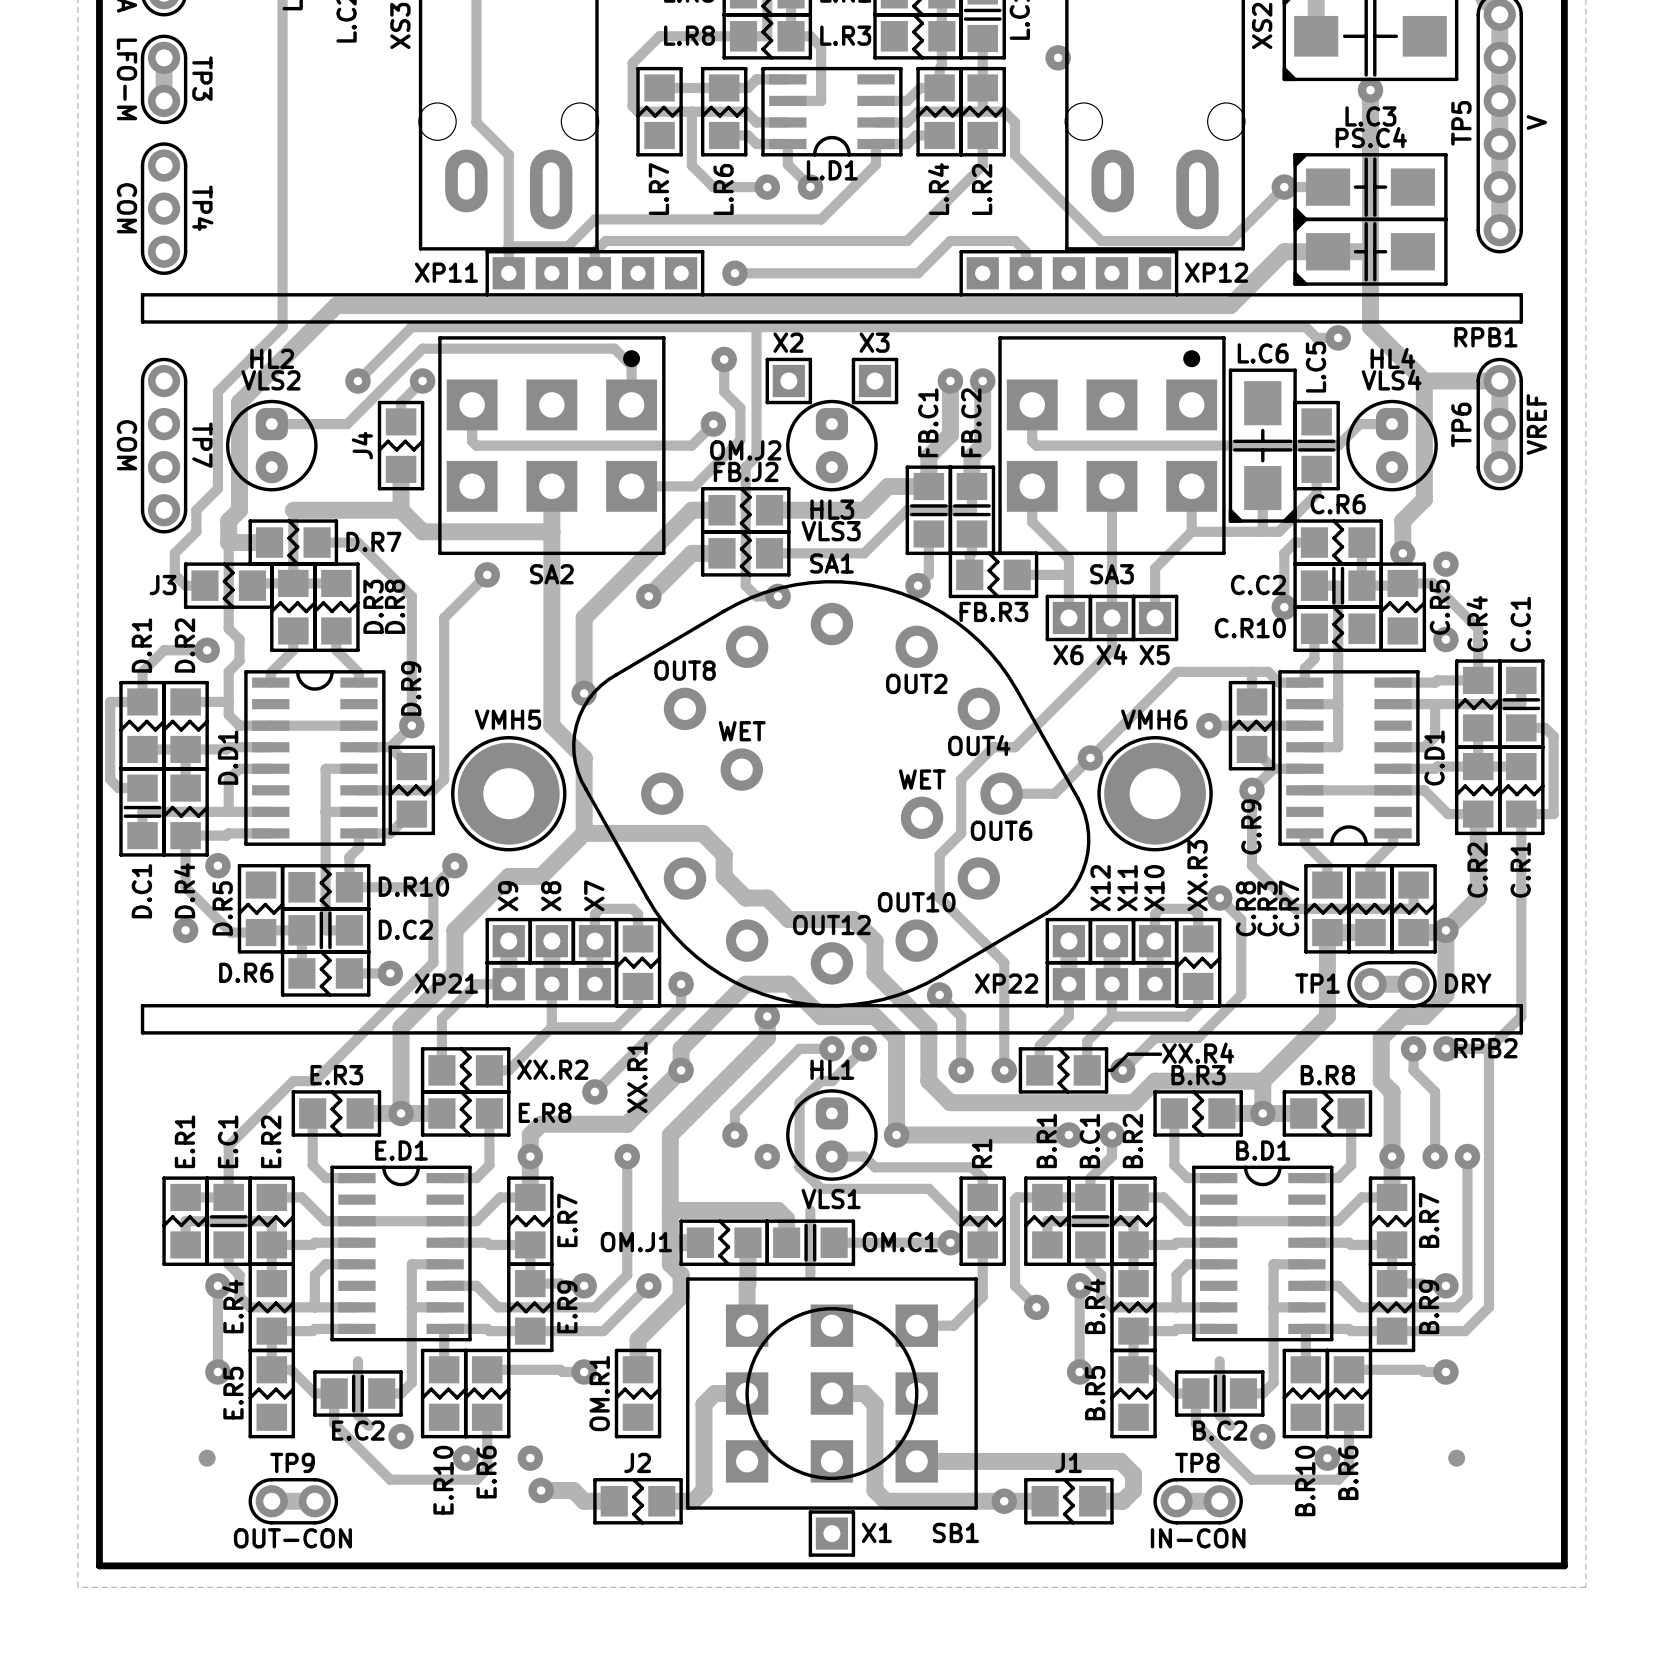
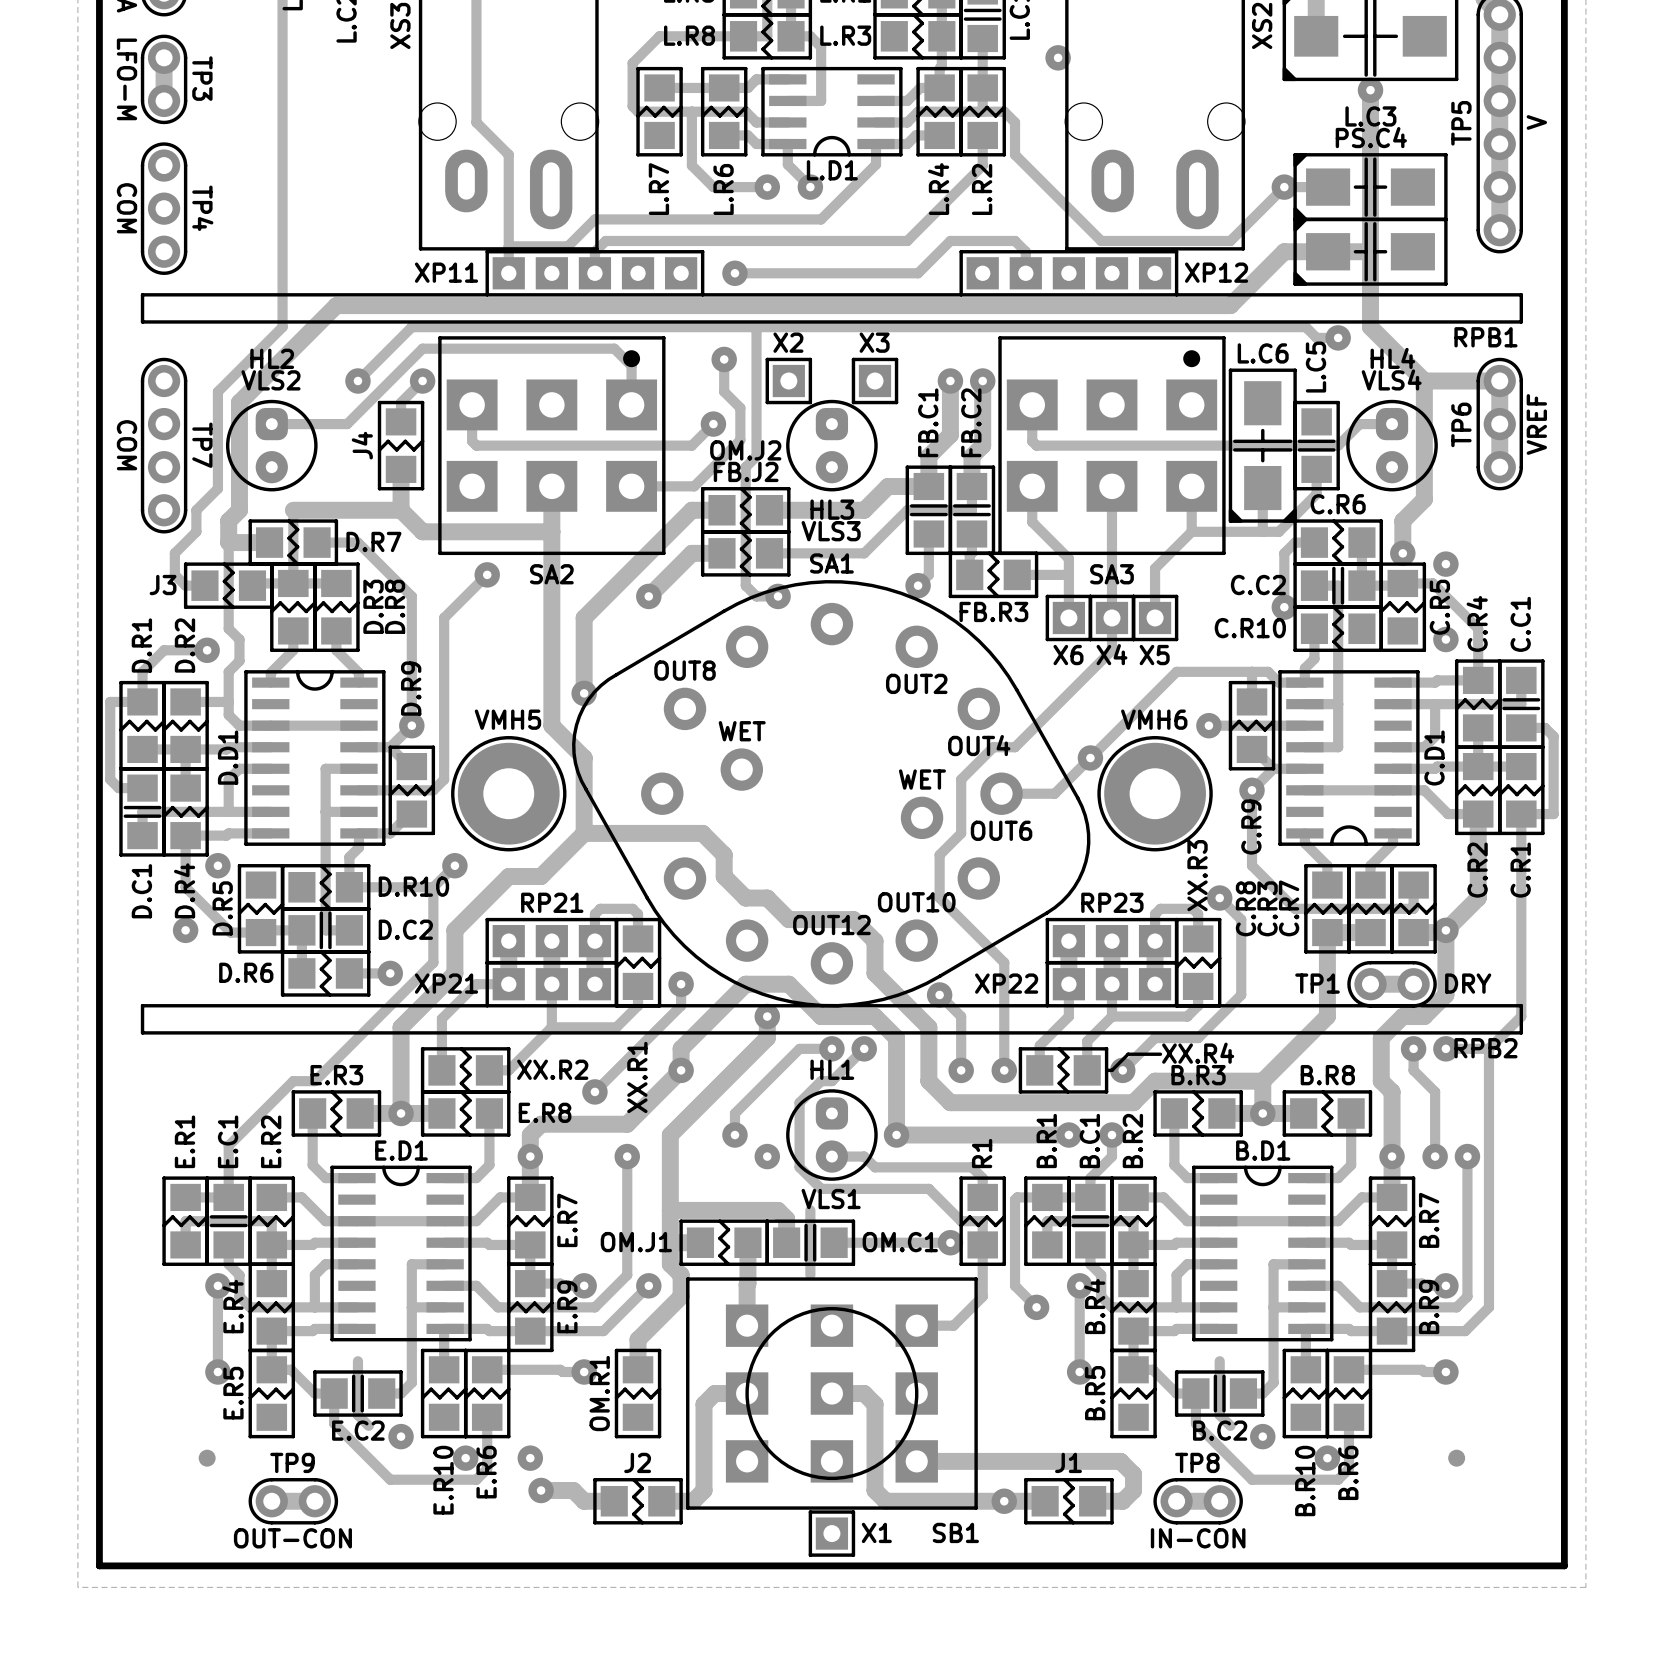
X9: (508, 941) -> none
X8: (551, 941) -> none
RP21: none -> (551, 941)
X7: (594, 941) -> none
X12: (1068, 941) -> none
X11: (1111, 941) -> none
RP23: none -> (1111, 941)
X10: (1155, 941) -> none

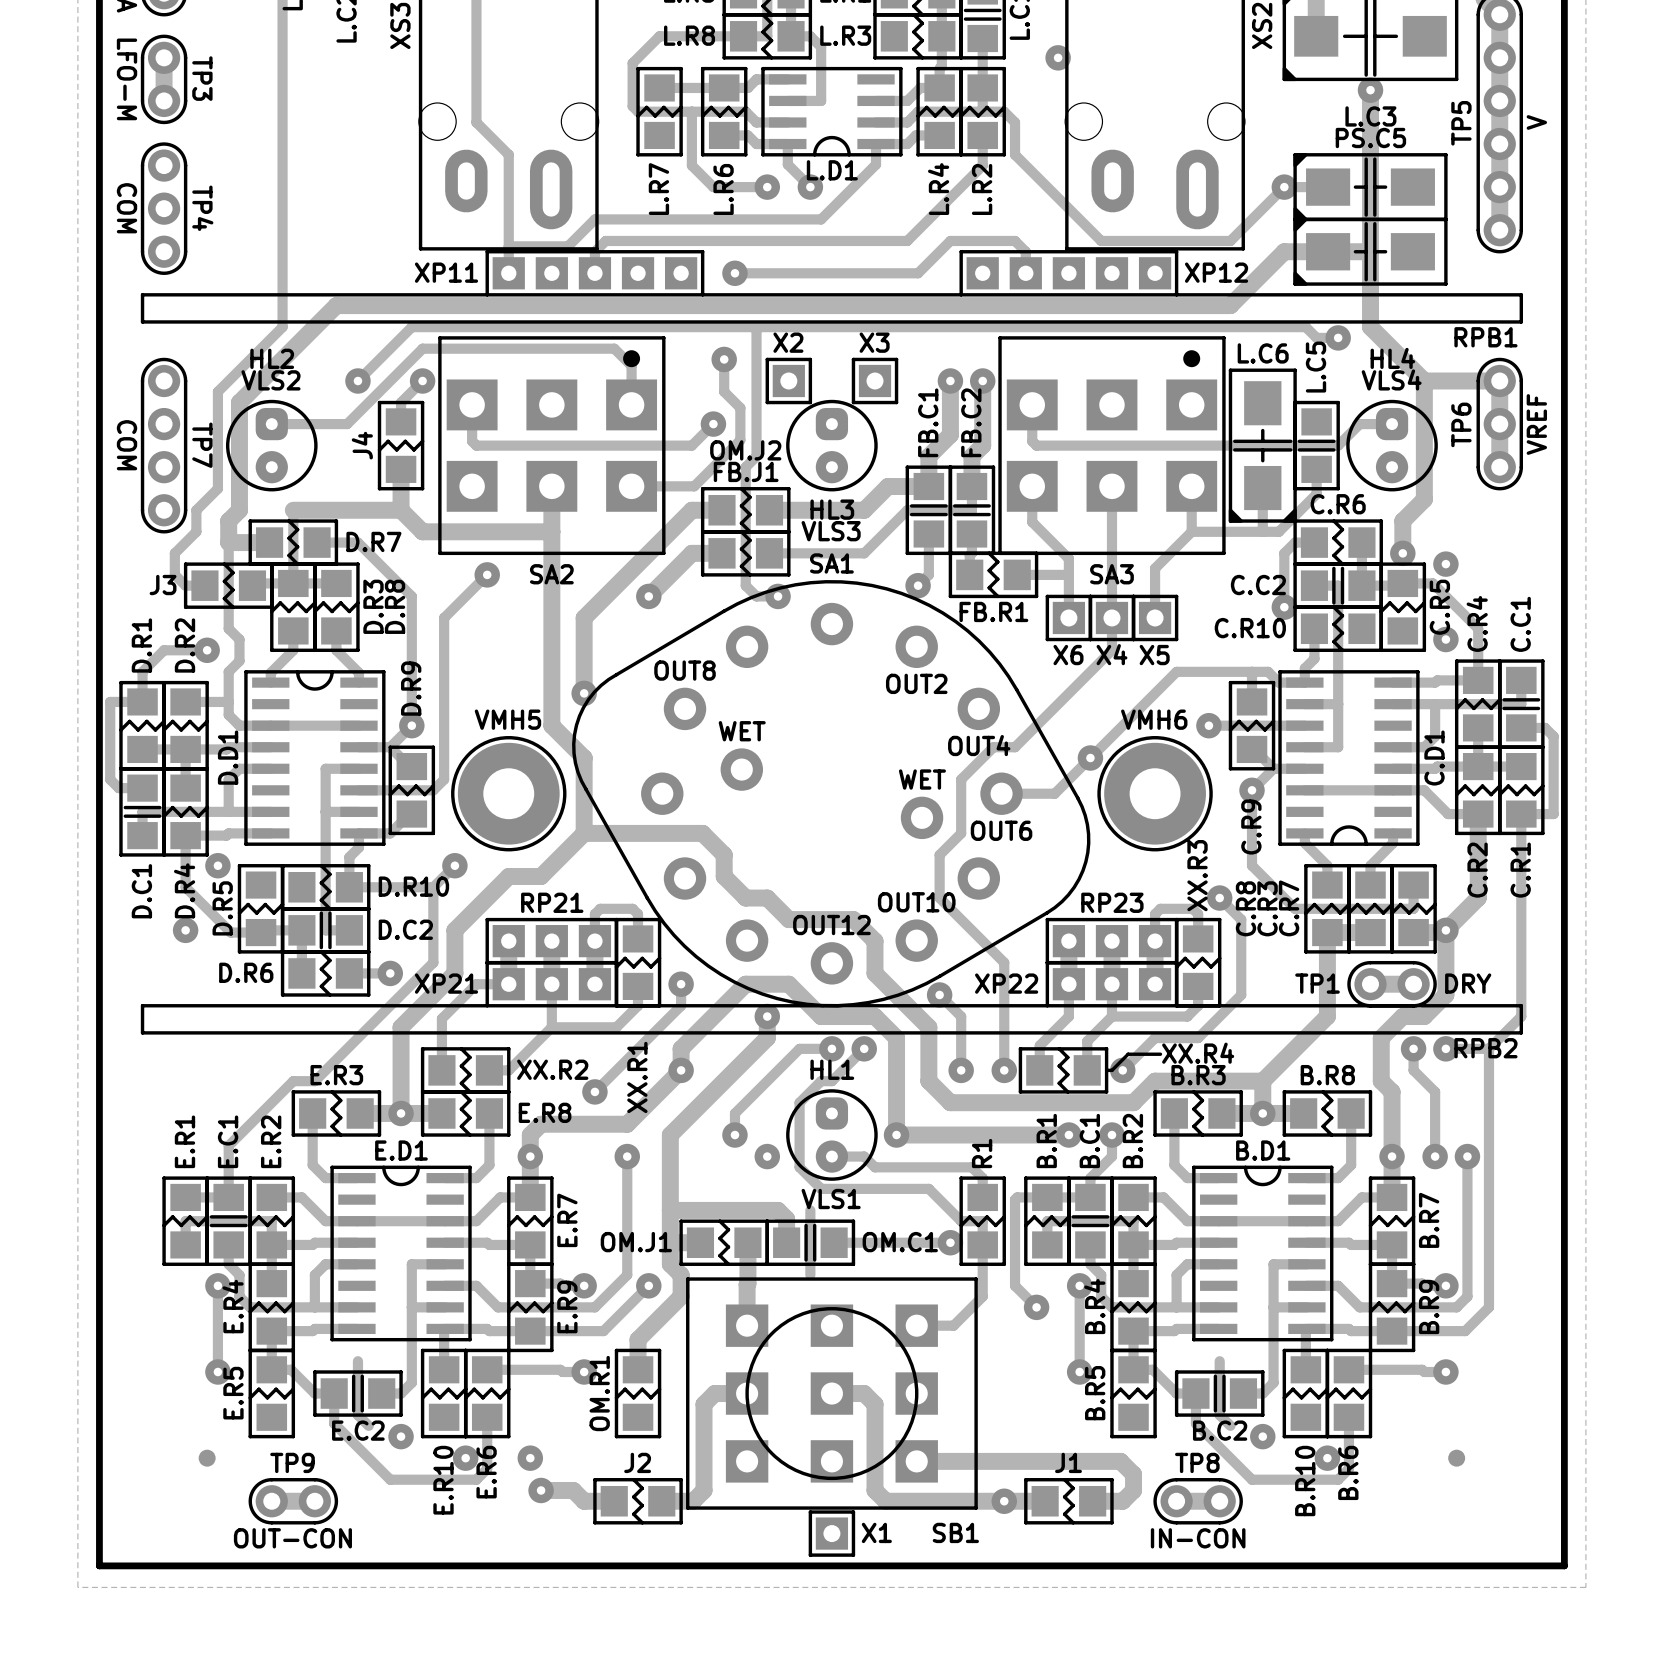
PS.C4 name: PS.C4 (1371, 137) -> PS.C5 (1370, 138)
FB.J2 name: FB.J2 (746, 471) -> FB.J1 (746, 471)
FB.R3 name: FB.R3 (993, 611) -> FB.R1 (993, 611)

